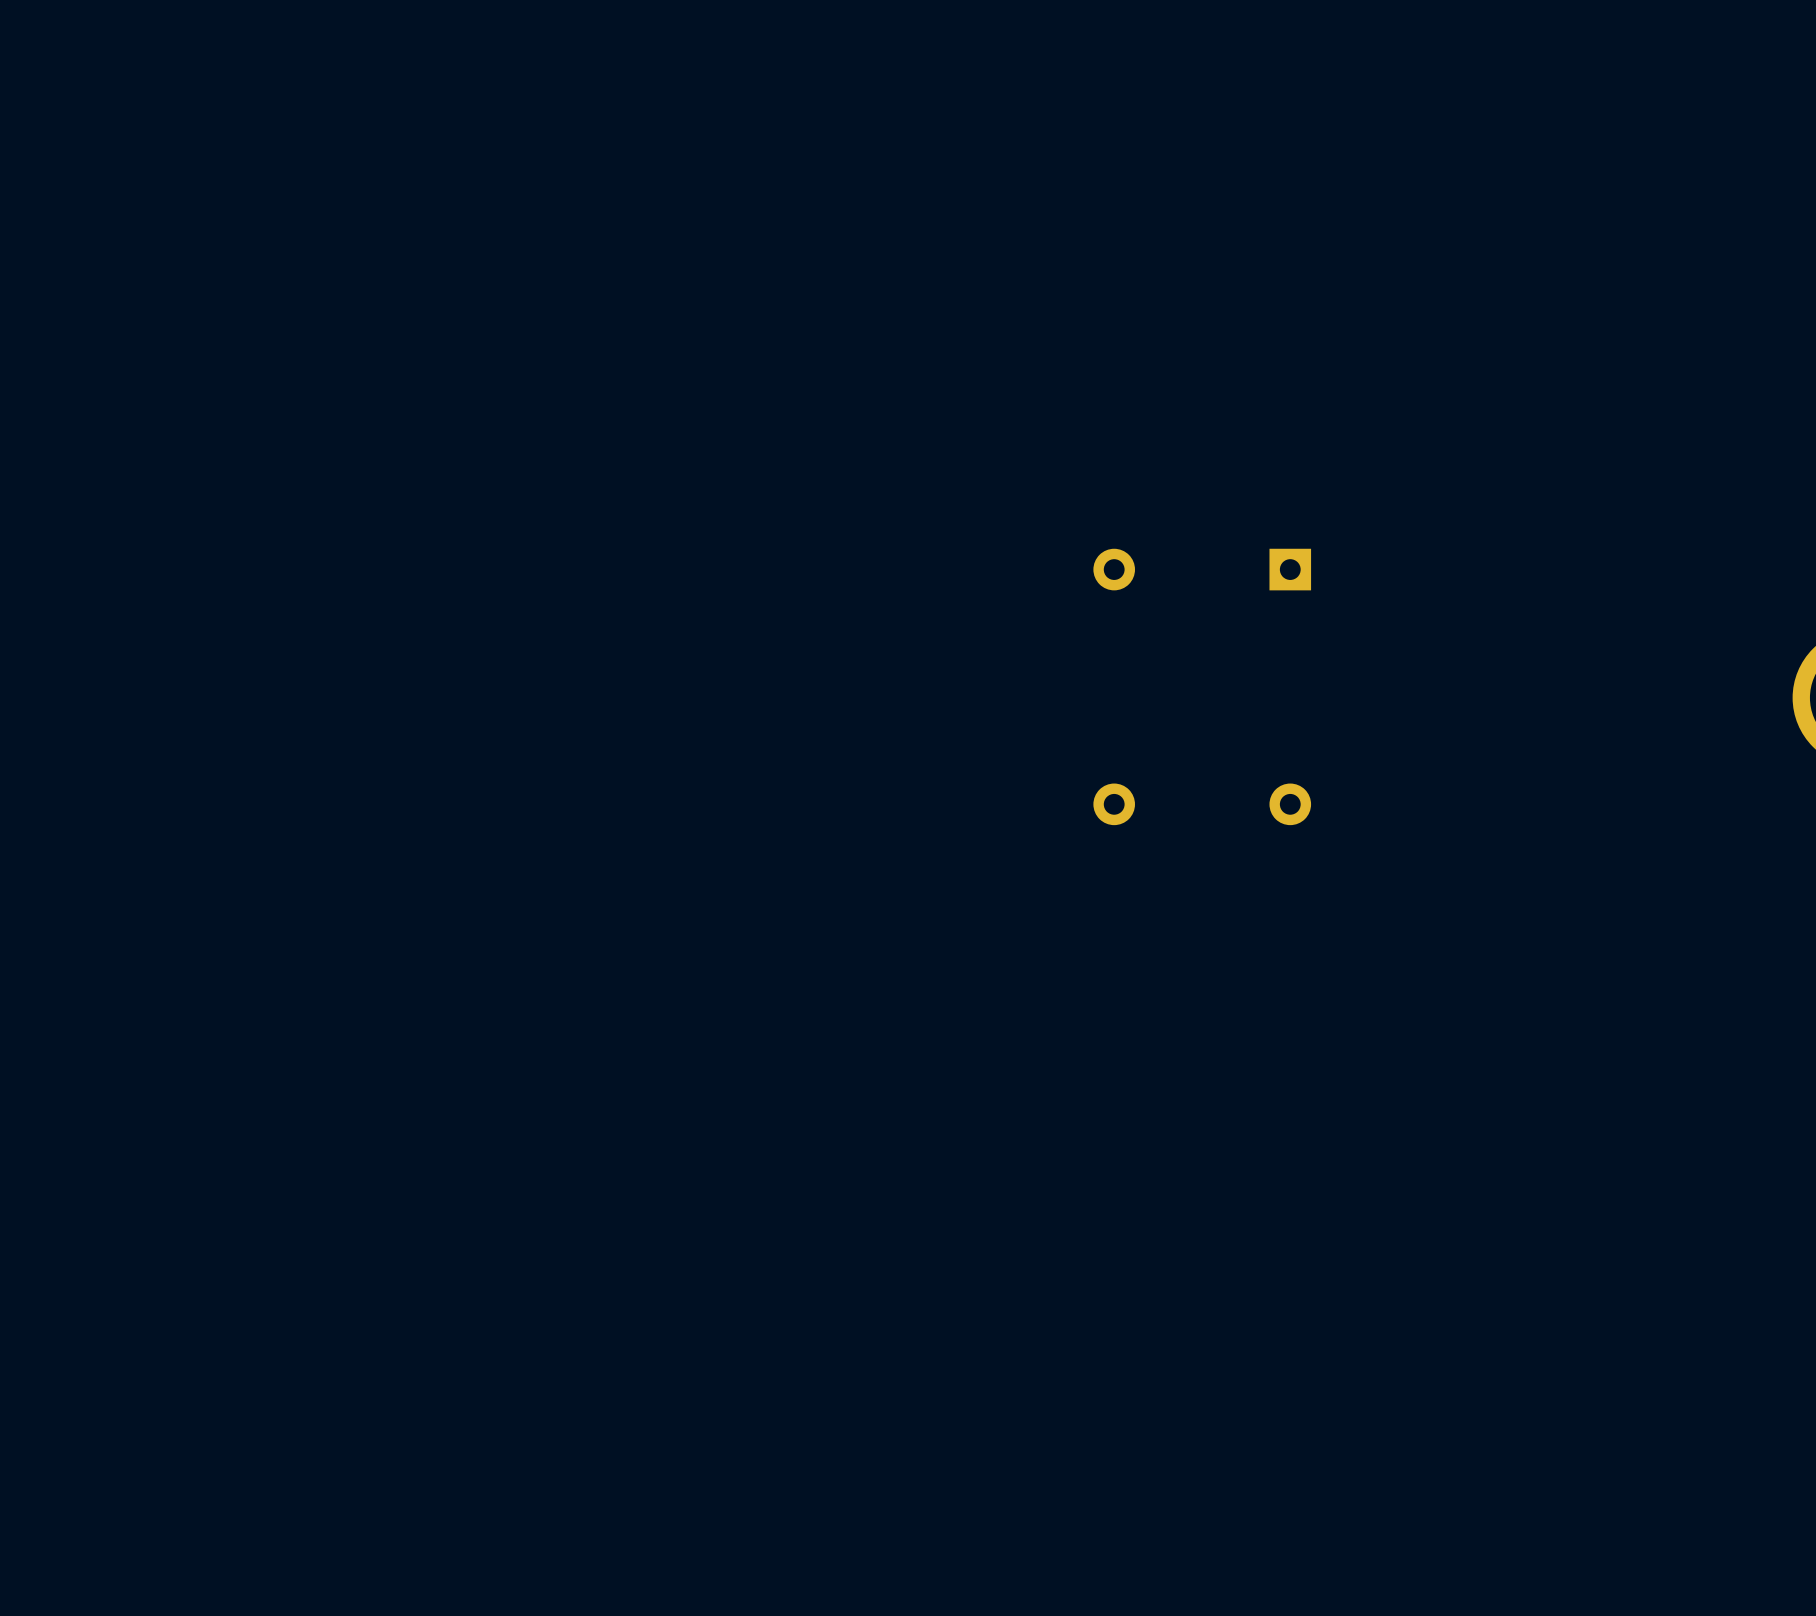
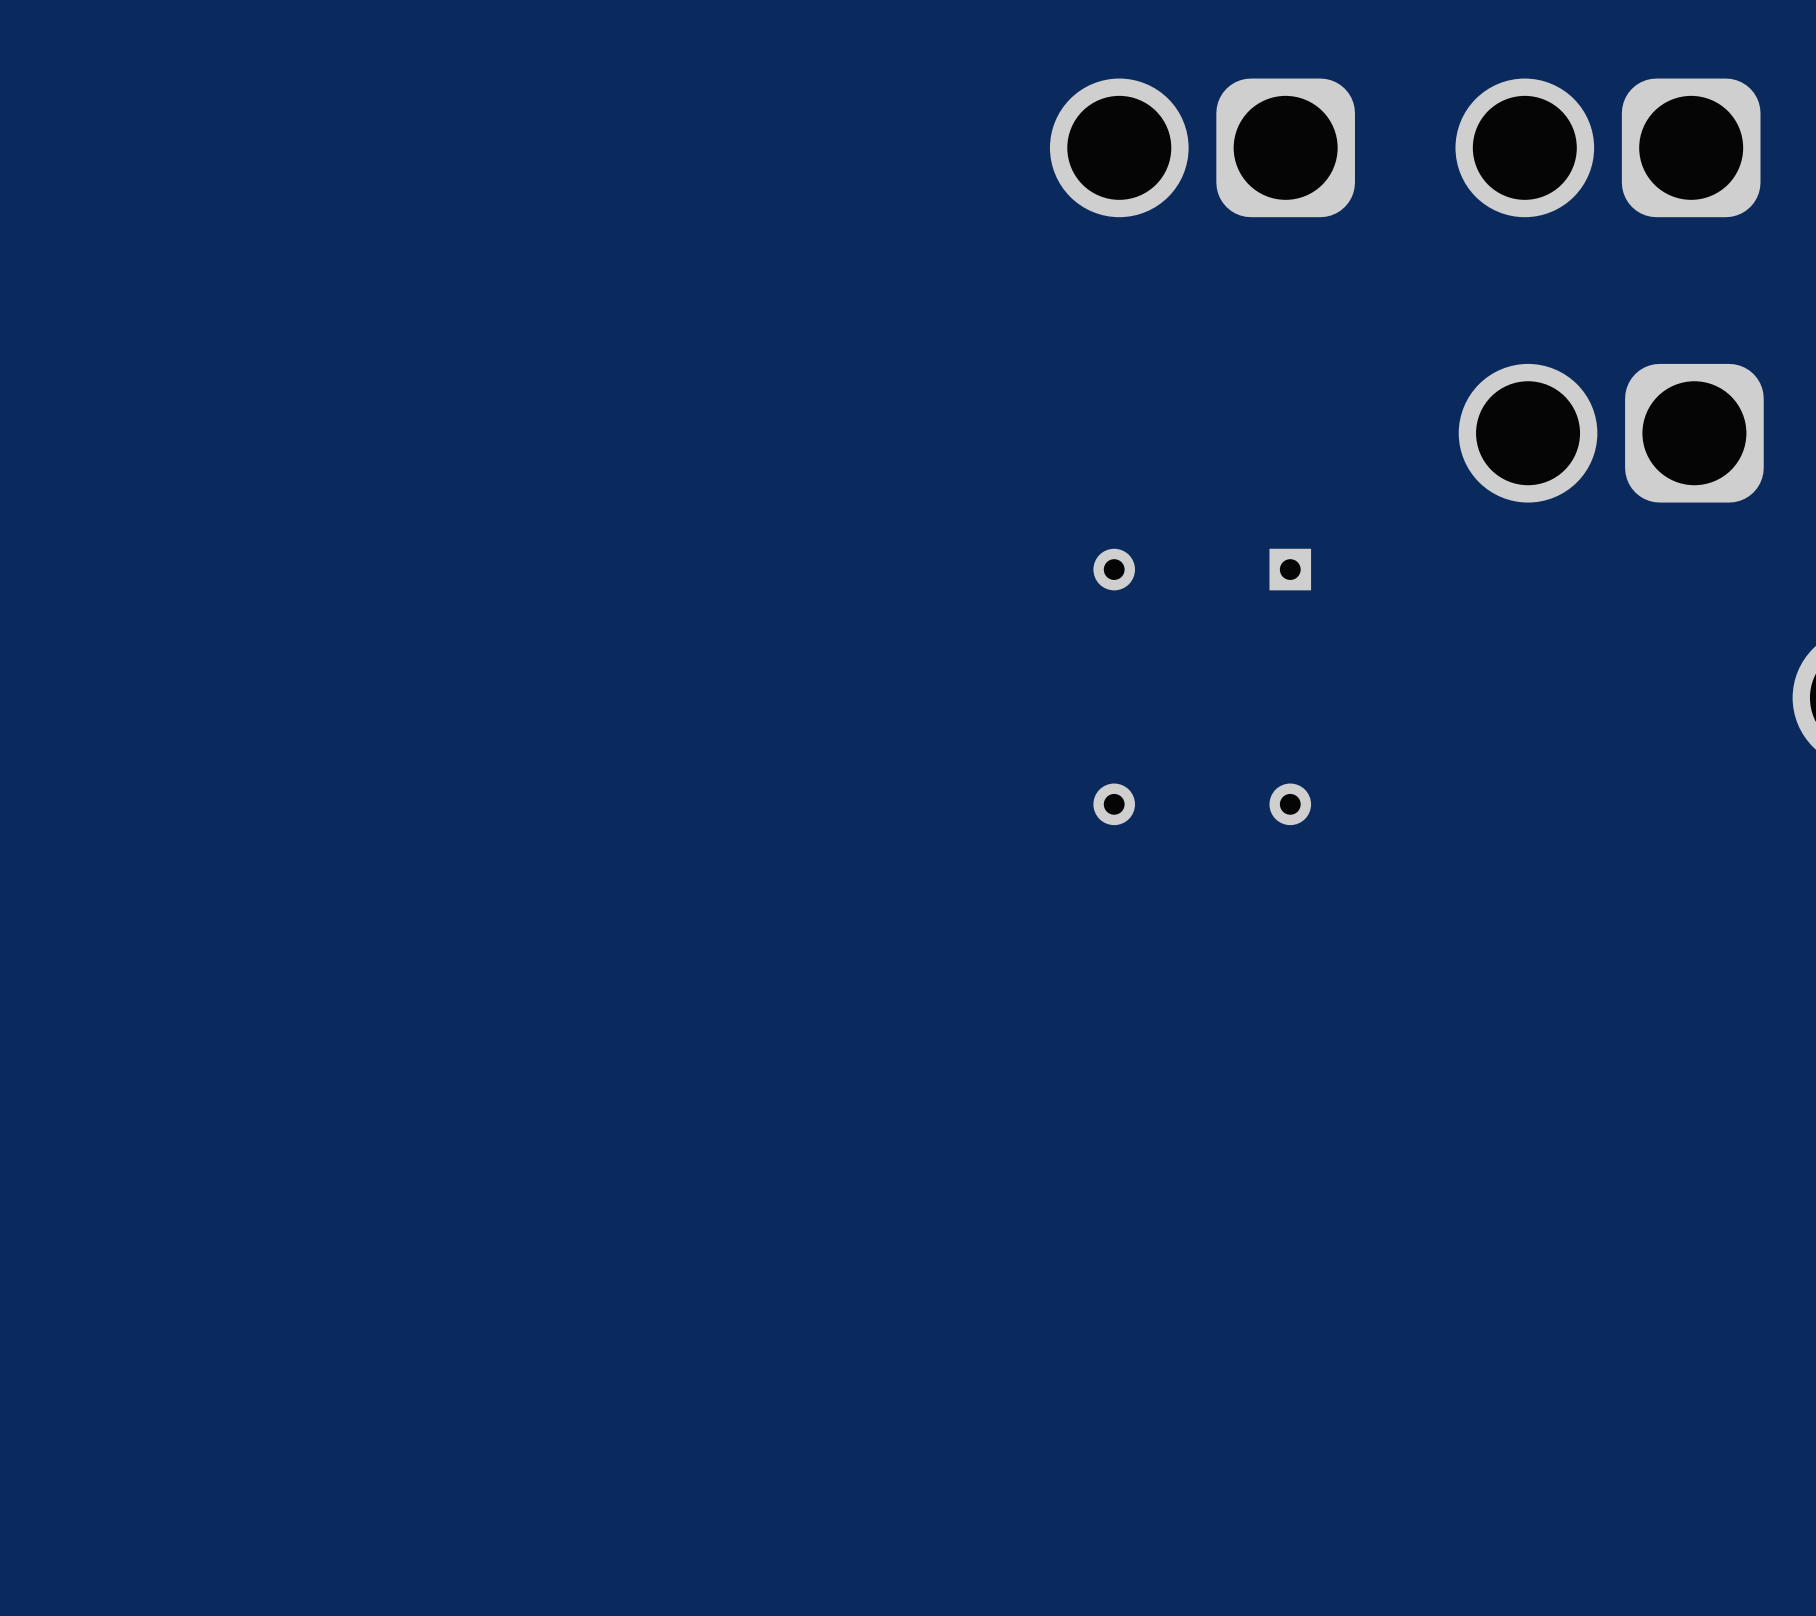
part: none -> (1202, 147)
part: none -> (1607, 147)
part: none -> (1611, 433)

